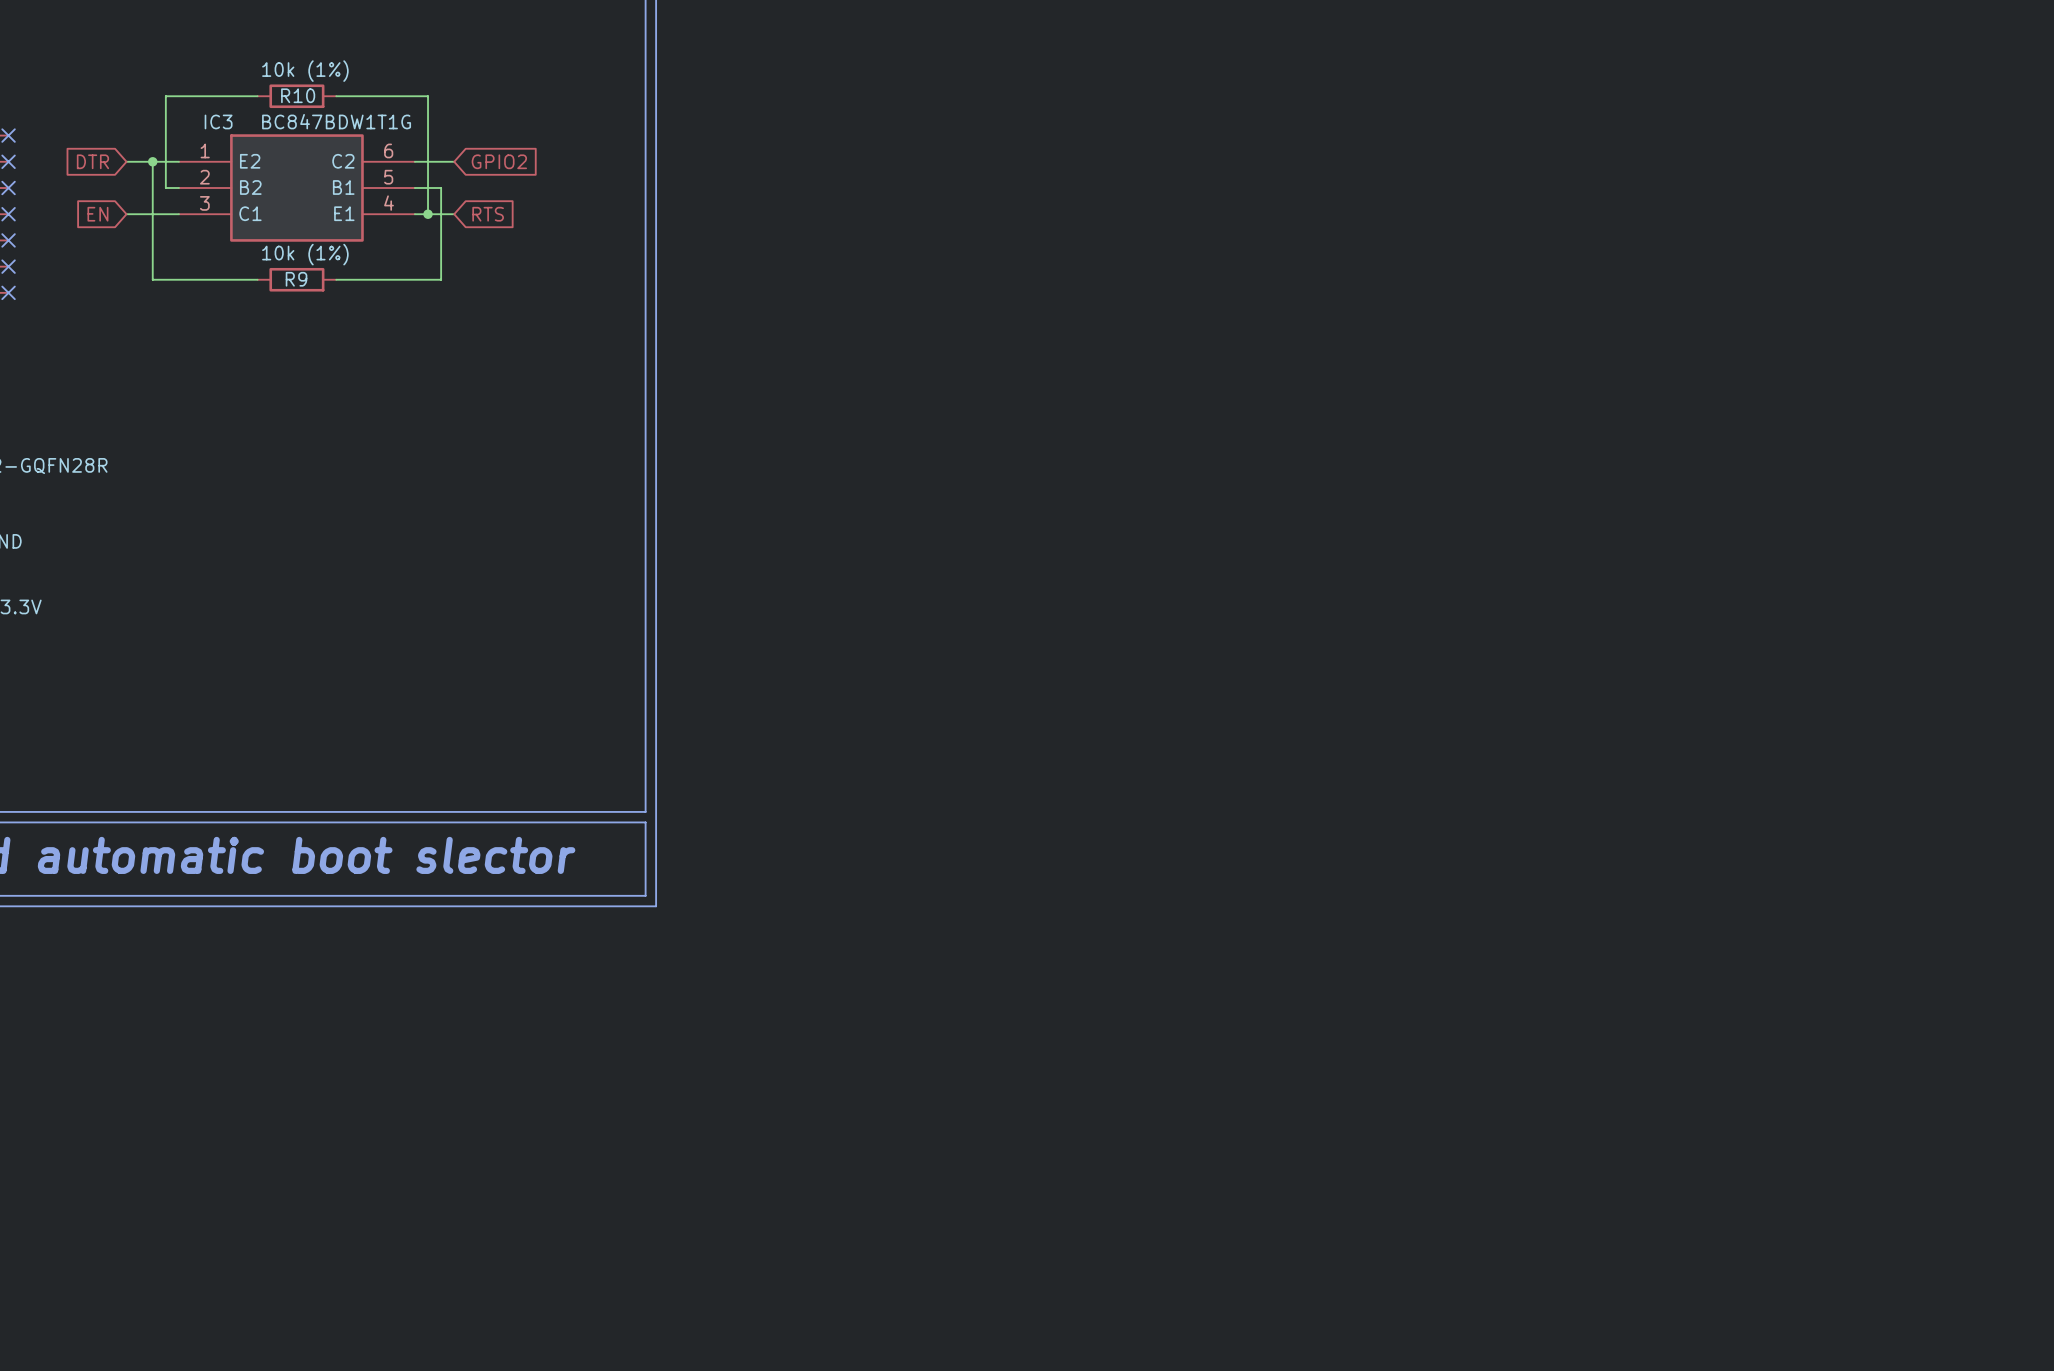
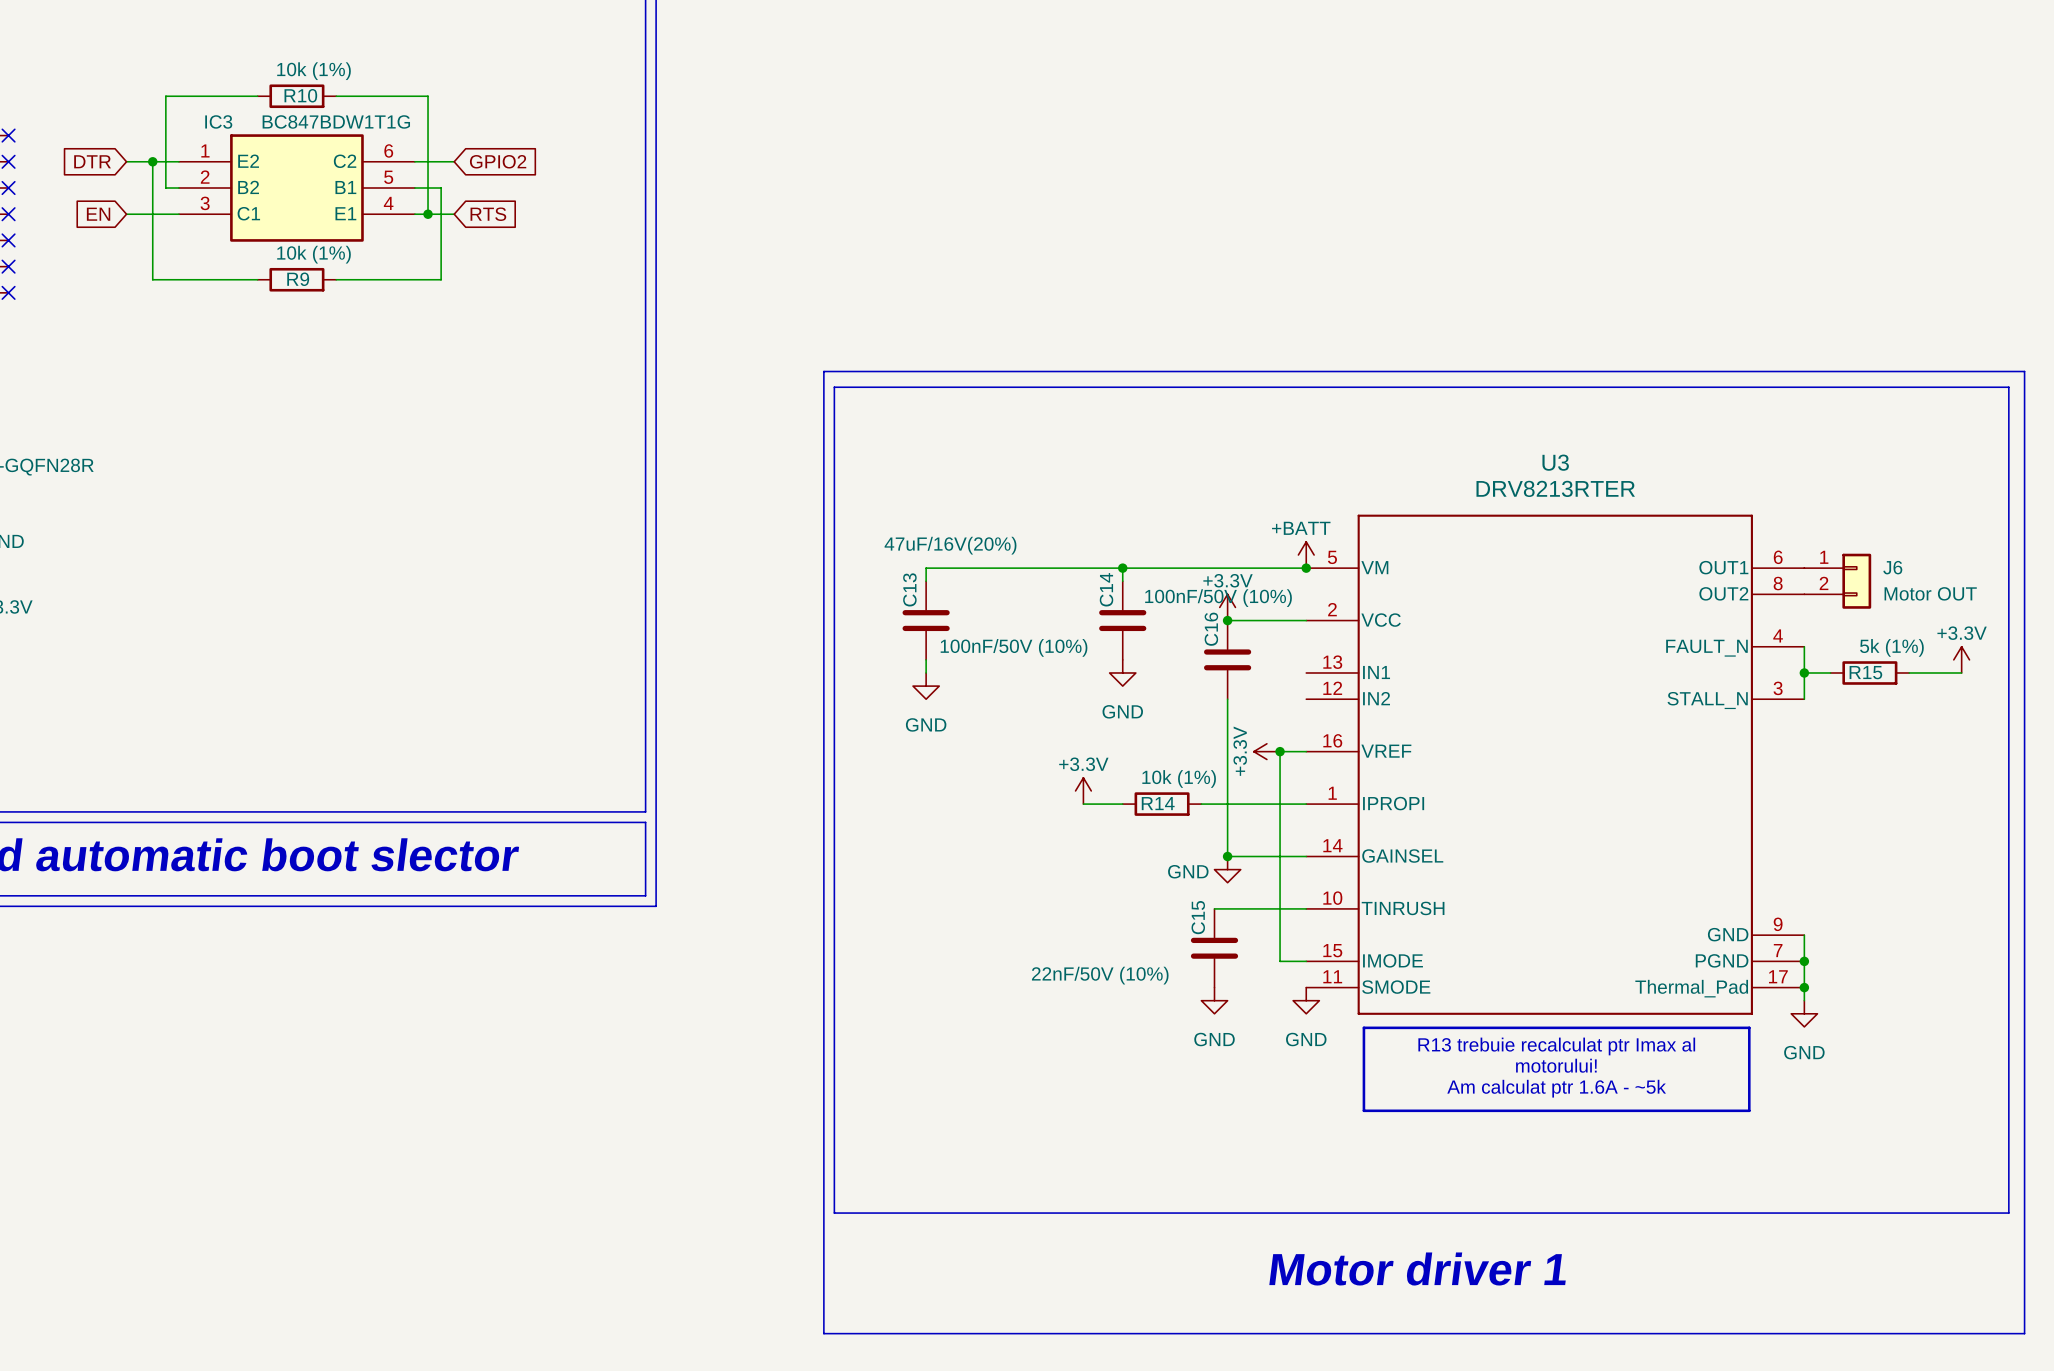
line: none -> (823, 371) (2024, 371) (2024, 1333) (823, 1333) (823, 371)
line: none -> (834, 387) (2008, 387) (2008, 1213) (834, 1213) (834, 387)
power symbol: none -> +BATT (1306, 555)
wire: none -> (1122, 568) (1122, 581)
junction: none -> (1122, 568)
wire: none -> (1306, 568) (926, 568) (926, 581)
junction: none -> (1306, 568)
J6: none -> Motor OUT (1837, 581)
power symbol: none -> +3.3V (1227, 607)
C13: none -> 47uF/16V(20%) (926, 620)
C14: none -> 100nF/50V (10%) (1122, 620)
wire: none -> (1227, 620) (1306, 620)
junction: none -> (1227, 620)
wire: none -> (1804, 646) (1804, 699)
wire: none -> (926, 659) (926, 672)
C16: none -> 100nF/50V (10%) (1227, 659)
power symbol: none -> +3.3V (1961, 659)
power symbol: none -> GND (1122, 672)
wire: none -> (1804, 672) (1830, 672)
junction: none -> (1804, 672)
R15: none -> 5k (1%) (1869, 672)
wire: none -> (1909, 672) (1961, 672)
power symbol: none -> GND (926, 686)
wire: none -> (1227, 699) (1227, 856) (1306, 856)
power symbol: none -> +3.3V (1266, 751)
junction: none -> (1280, 751)
wire: none -> (1306, 751) (1280, 751) (1280, 961) (1306, 961)
U3: none -> DRV8213RTER (1555, 764)
power symbol: none -> +3.3V (1083, 790)
wire: none -> (1083, 804) (1122, 804)
R14: none -> 10k (1%) (1162, 804)
wire: none -> (1201, 804) (1306, 804)
junction: none -> (1227, 856)
power symbol: none -> GND (1227, 869)
wire: none -> (1214, 908) (1306, 908)
wire: none -> (1804, 935) (1804, 1000)
C15: none -> 22nF/50V (10%) (1214, 948)
junction: none -> (1804, 961)
junction: none -> (1804, 987)
power symbol: none -> GND (1214, 1000)
power symbol: none -> GND (1306, 1000)
power symbol: none -> GND (1804, 1013)
line: none -> (1363, 1027) (1749, 1027) (1749, 1110) (1363, 1110) (1363, 1027)
text: none -> R13 trebuie recalculat ptr Imax al (1556, 1046)
text: none -> motorului! (1556, 1065)
text: none -> Am calculat ptr 1.6A - ~5k (1556, 1088)
text: none -> Motor driver 1 (1417, 1269)

